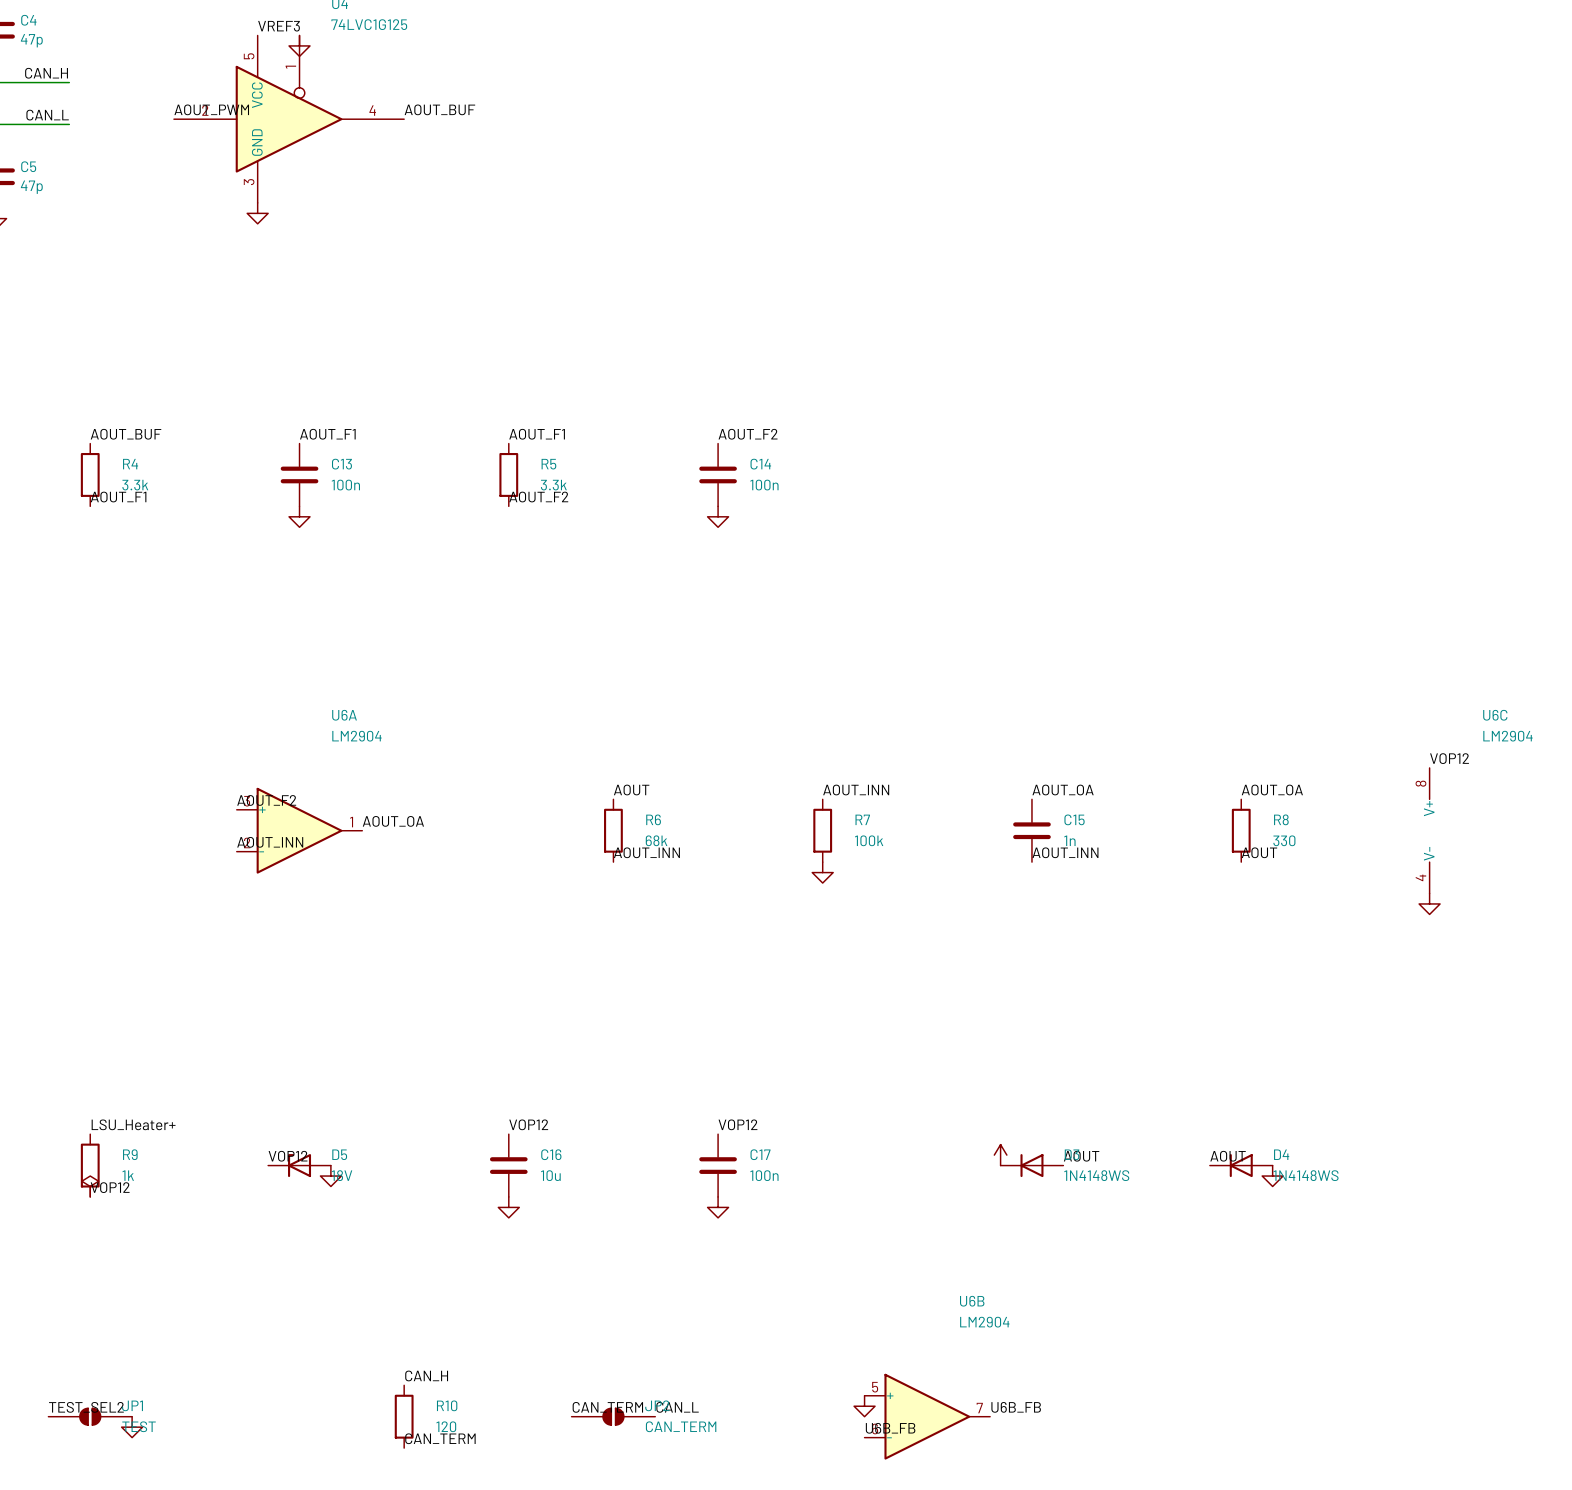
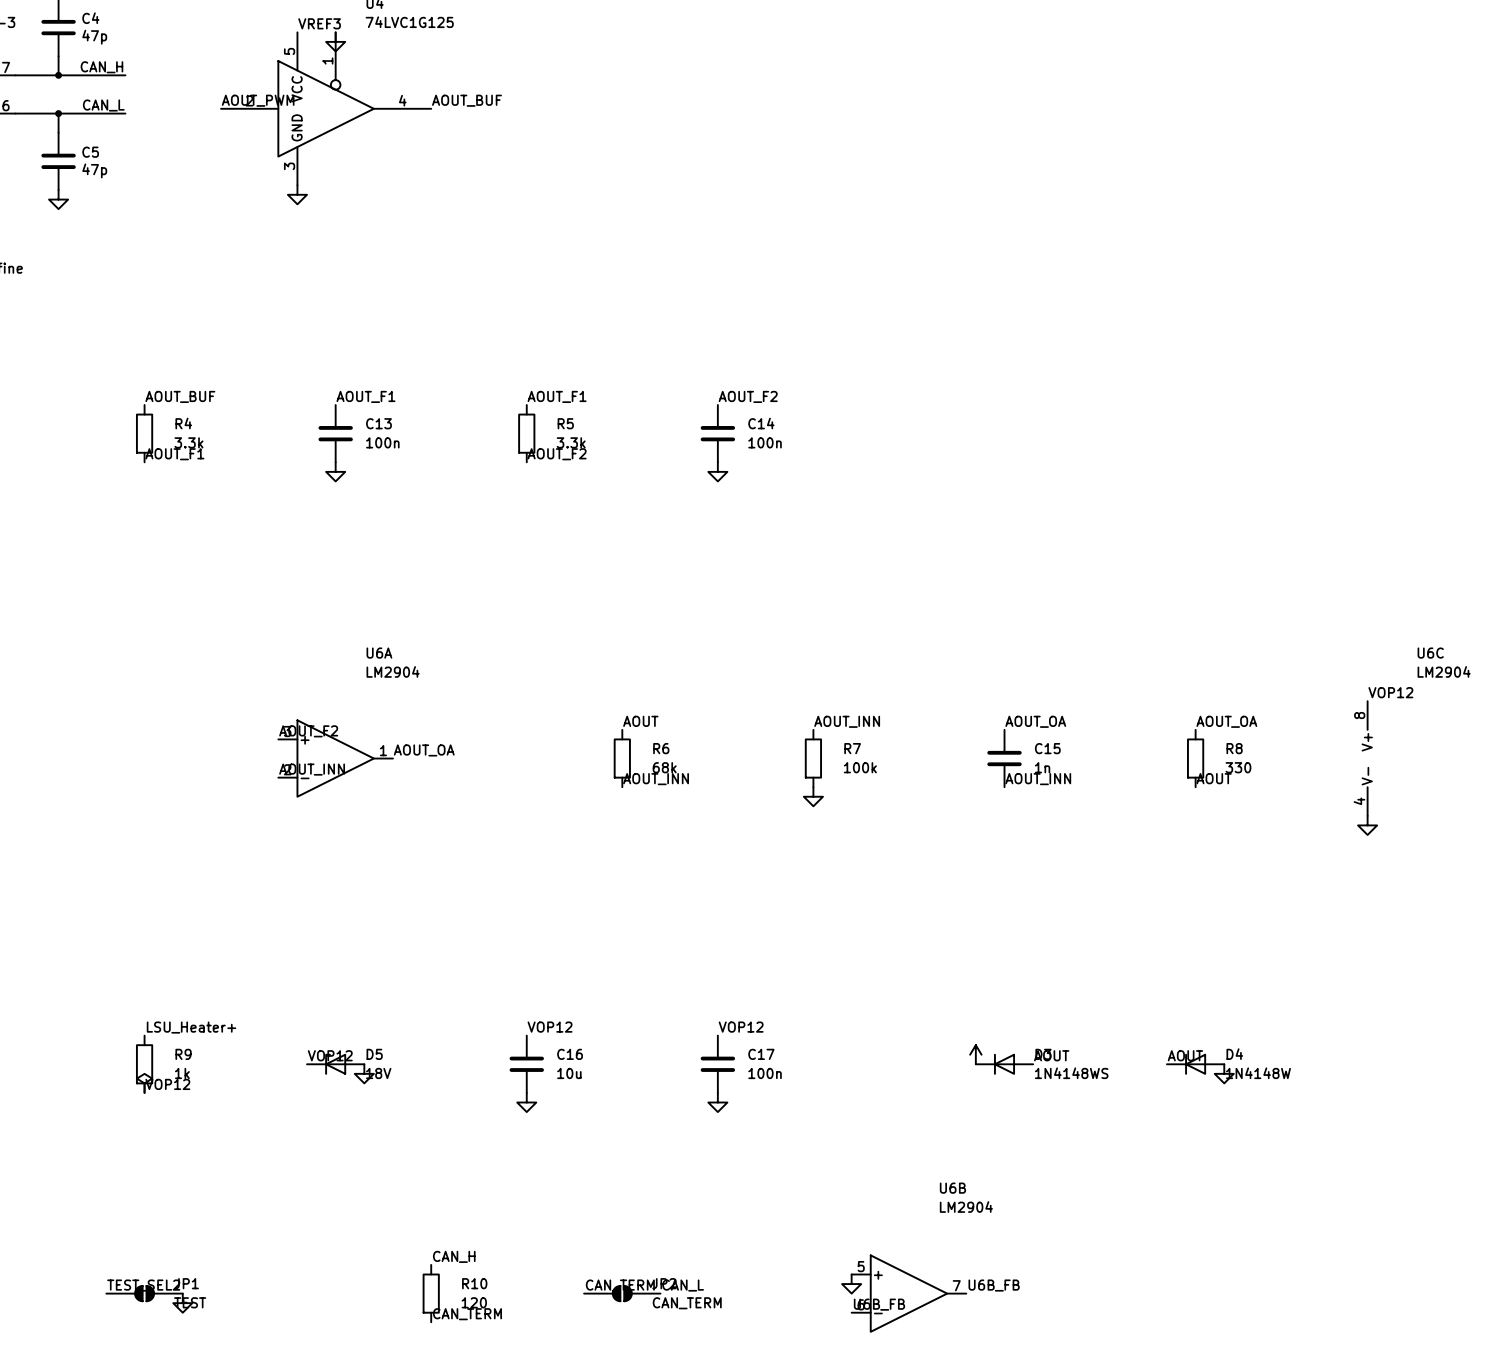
D4 value: 1N4148WS (1306, 1175) -> 1N4148W (1258, 1073)

